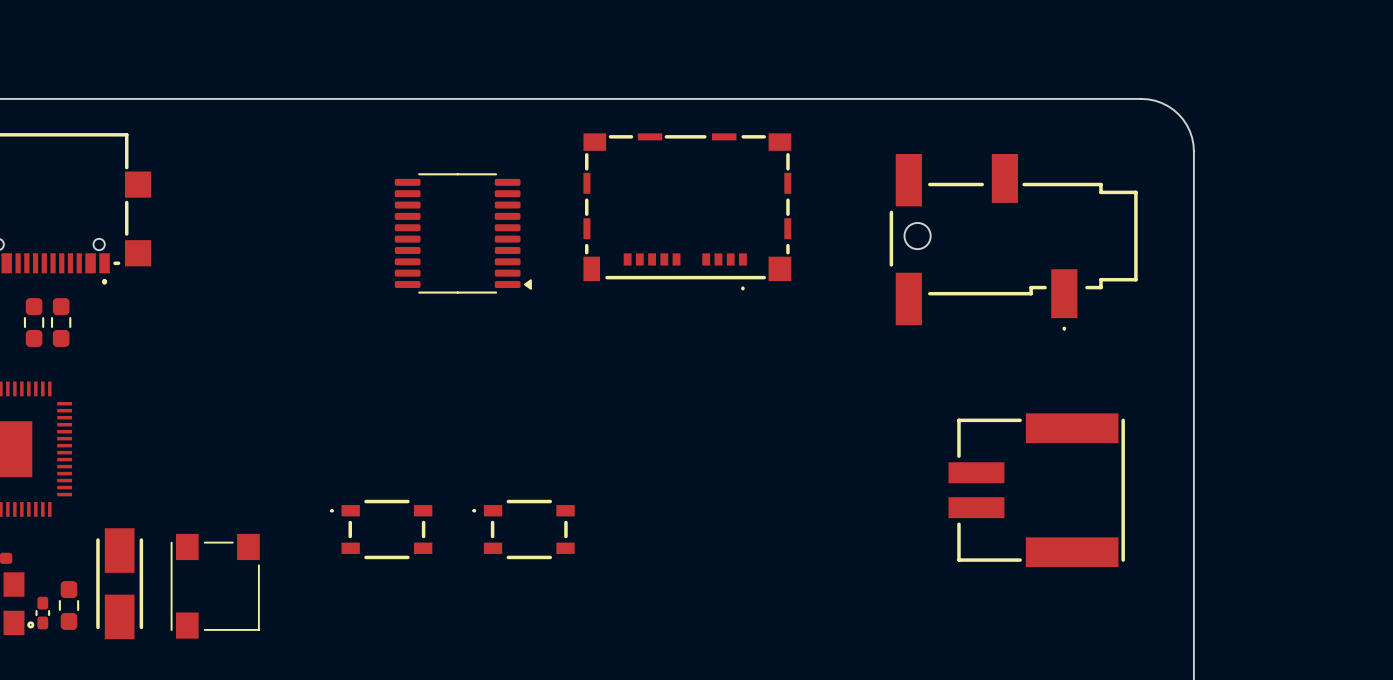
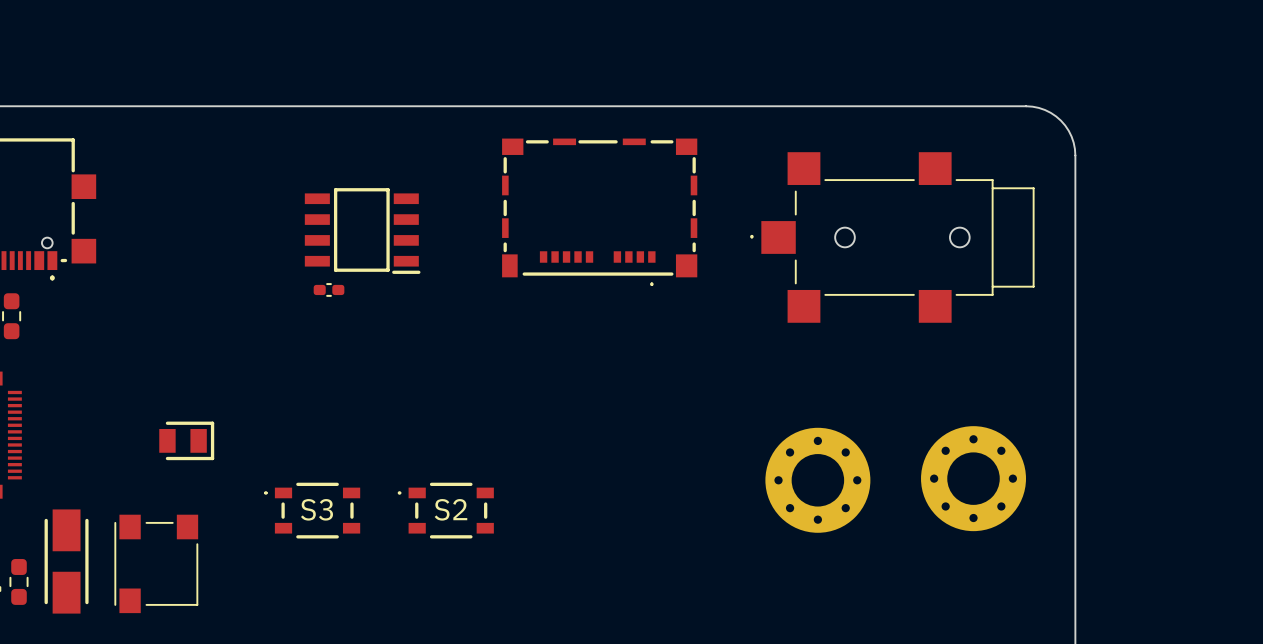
part footprint: [889, 153, 1138, 331] -> [750, 152, 1035, 323]
part: none -> (362, 231)
part: (463, 233) -> none
part: none -> (329, 289)
part: none -> (186, 440)
part: (1036, 490) -> none
part: none -> (973, 478)
part: none -> (817, 480)
S3 name: none -> S3 (316, 509)
S2 name: none -> S2 (450, 509)

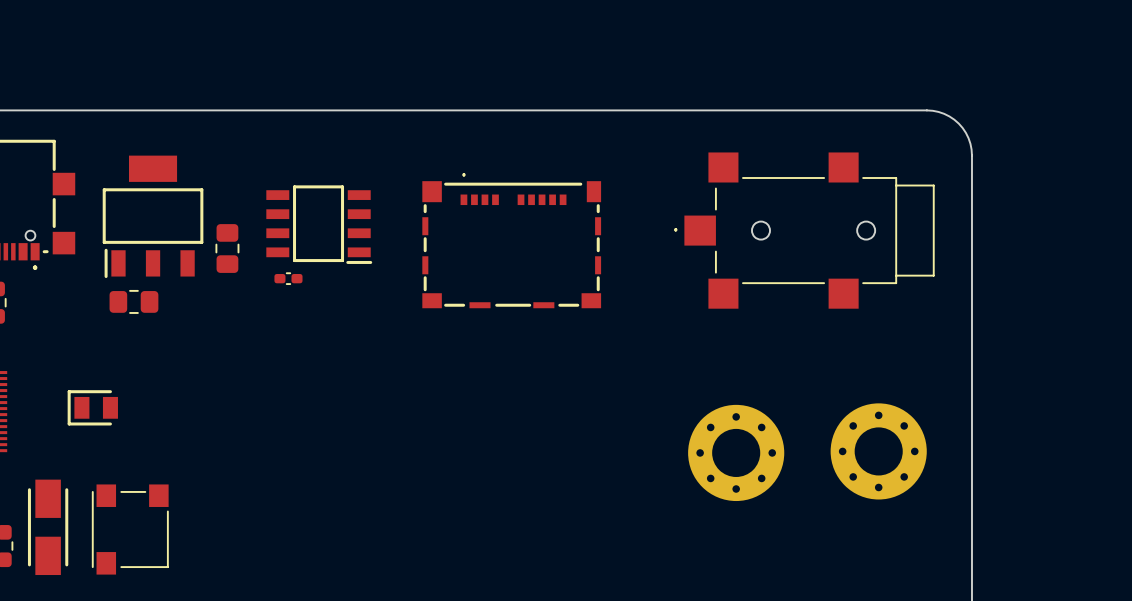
part rotation: 0° (599, 212) -> 180° (511, 240)
part: none -> (153, 216)
part: none -> (227, 248)
part: none -> (133, 301)
part rotation: 0° (186, 440) -> 180° (92, 407)
part position: (186, 440) -> (92, 407)
S3: (312, 510) -> none
S2: (445, 510) -> none

